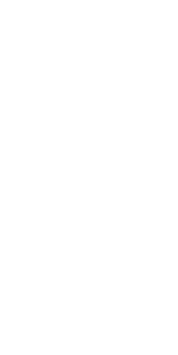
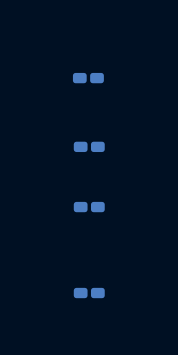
part: none -> (88, 78)
part: none -> (89, 146)
part: none -> (89, 207)
part: none -> (89, 293)

